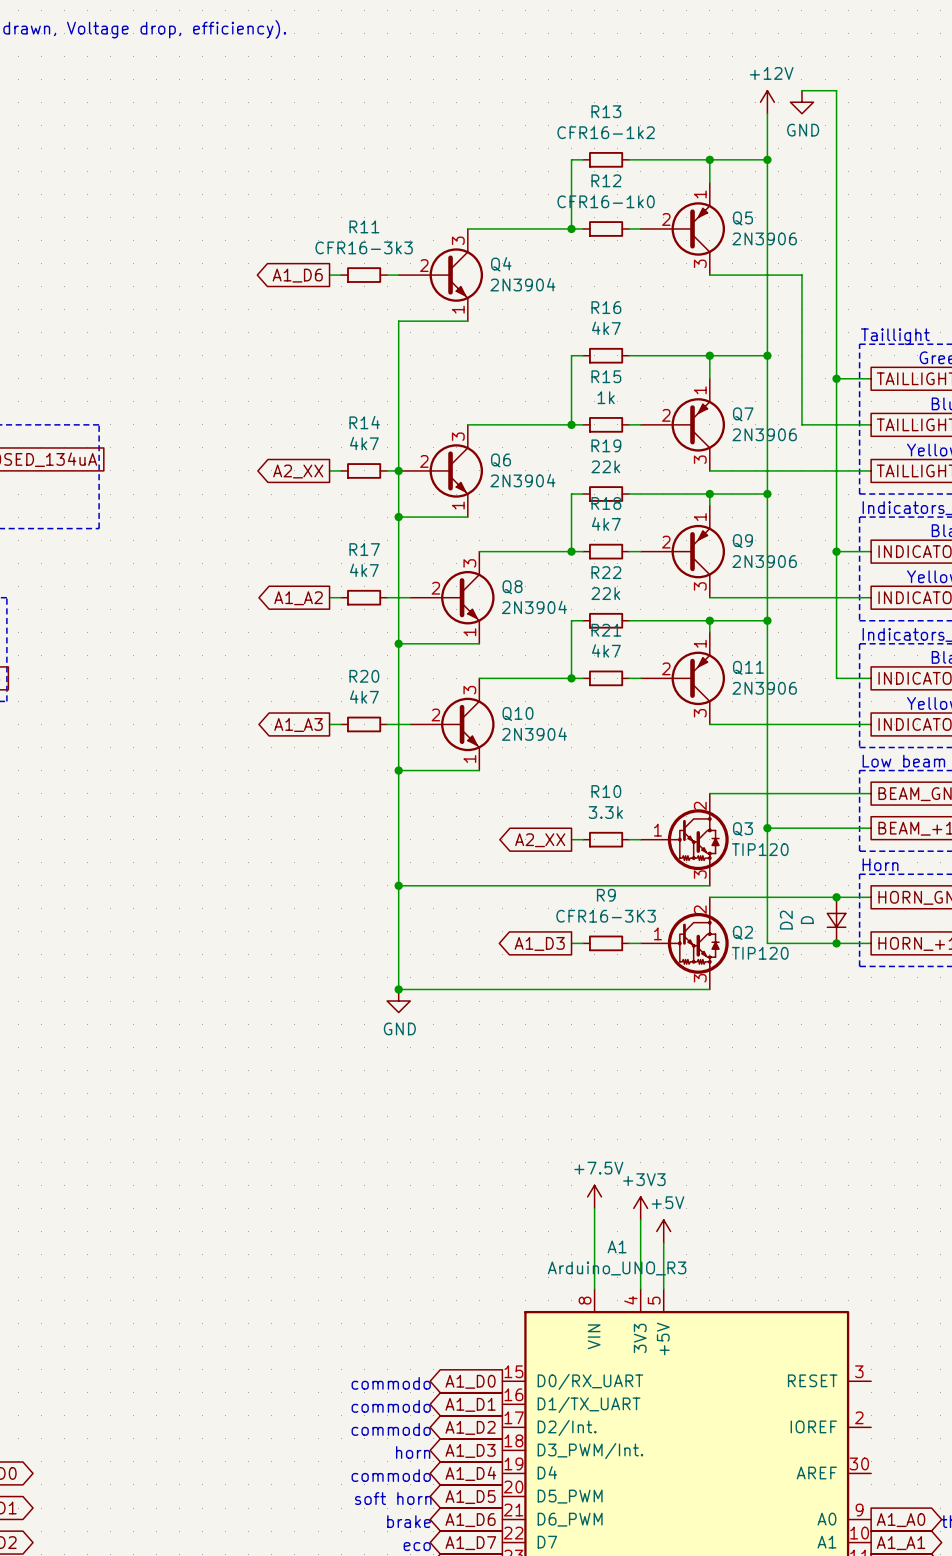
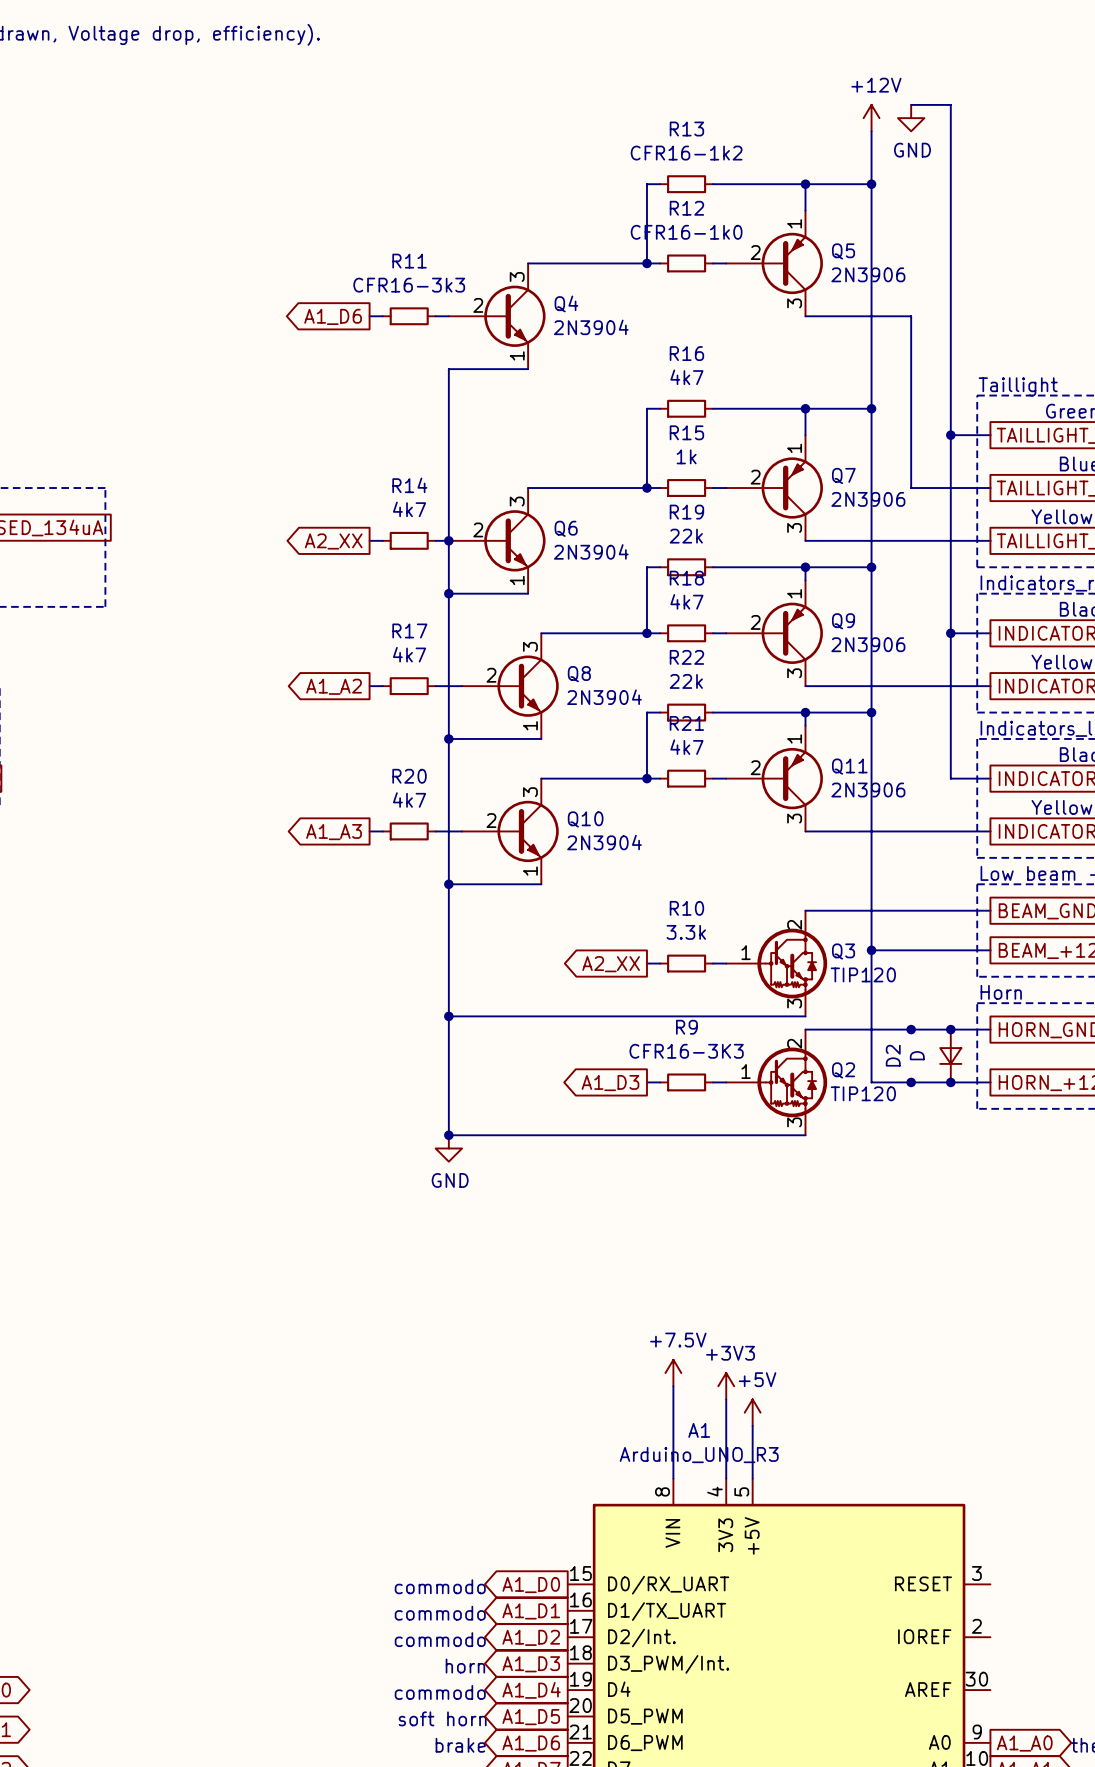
junction: none -> (911, 1029)
junction: none -> (911, 1082)

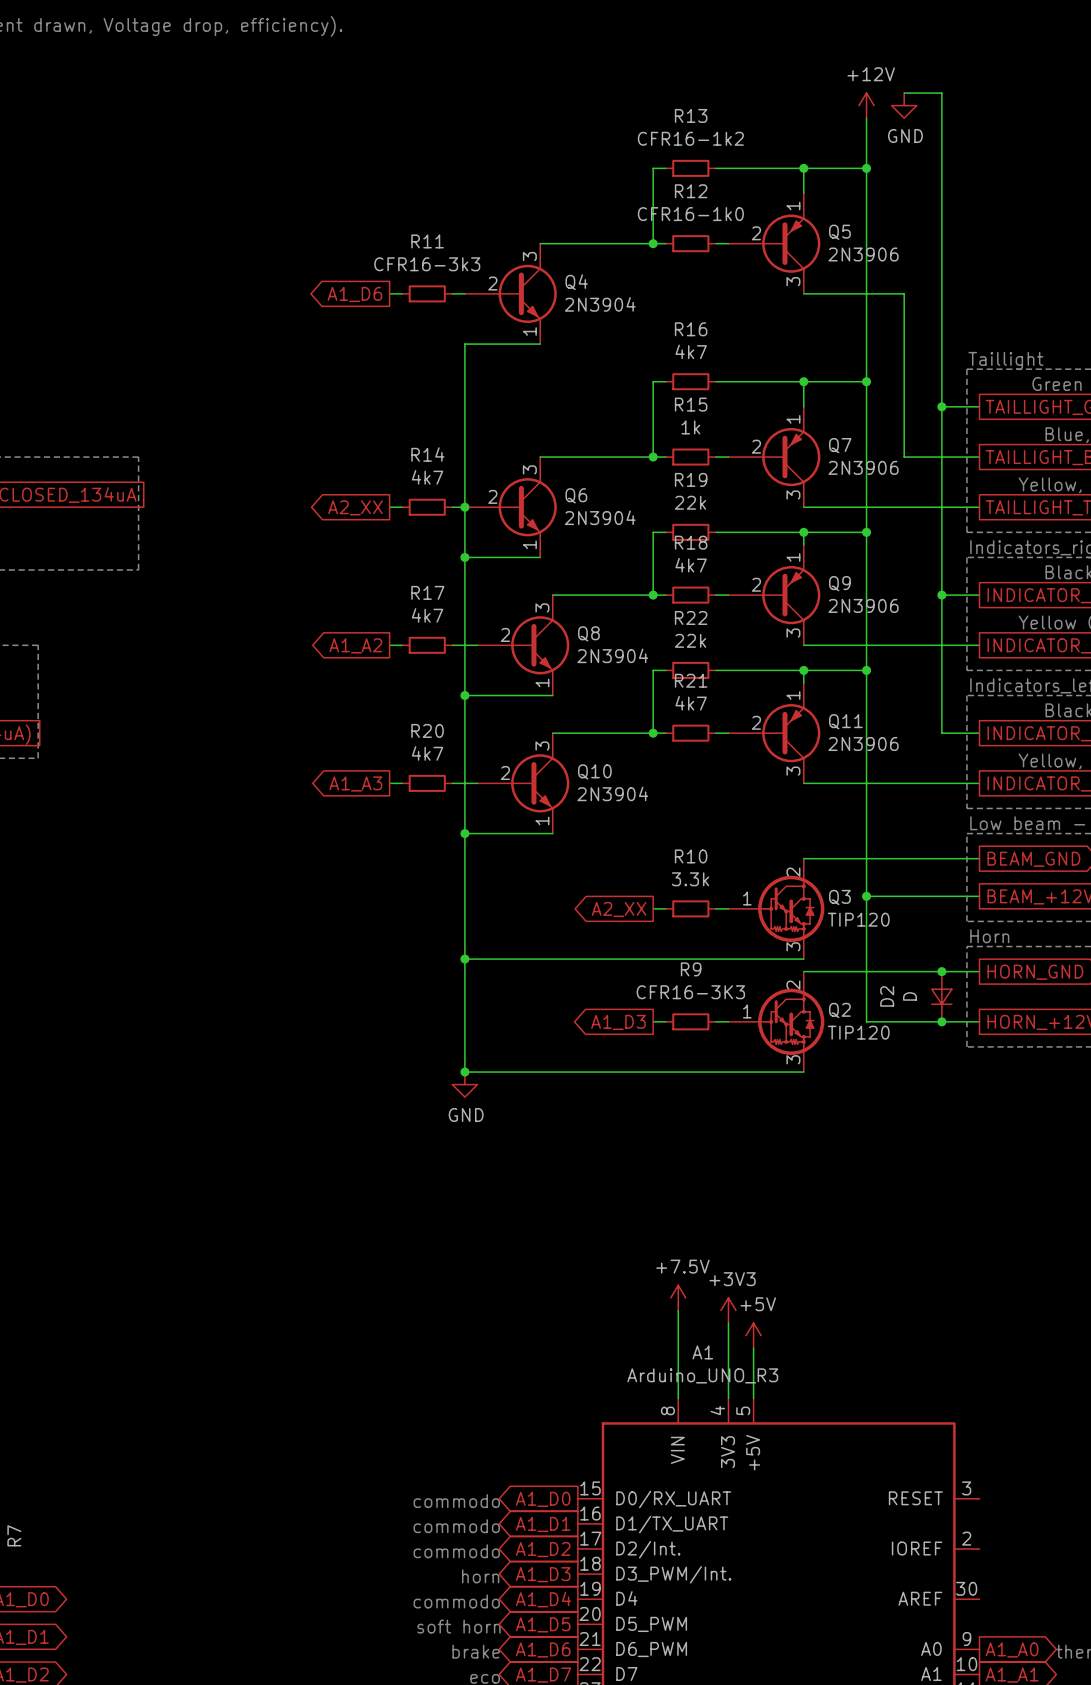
junction: (911, 1029) -> none
junction: (911, 1082) -> none

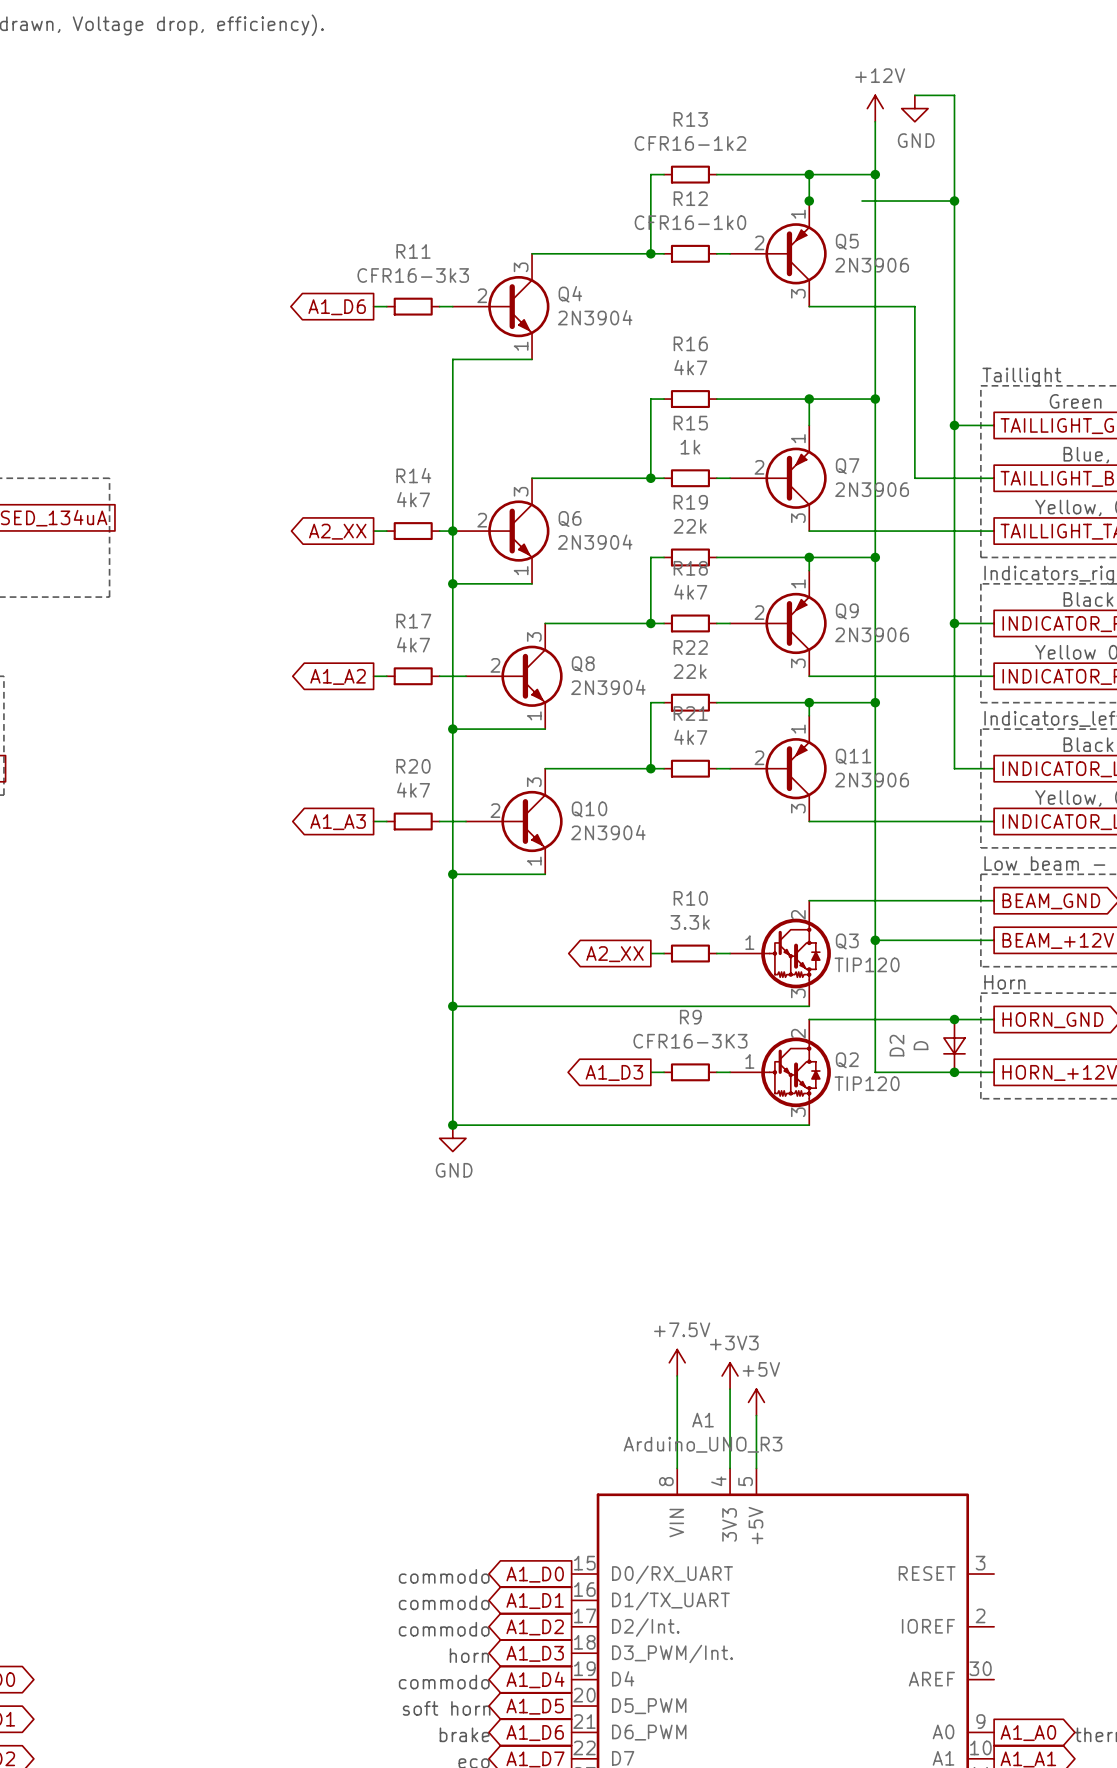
junction: none -> (809, 201)
wire: none -> (862, 201) (954, 201)
junction: none -> (954, 201)

